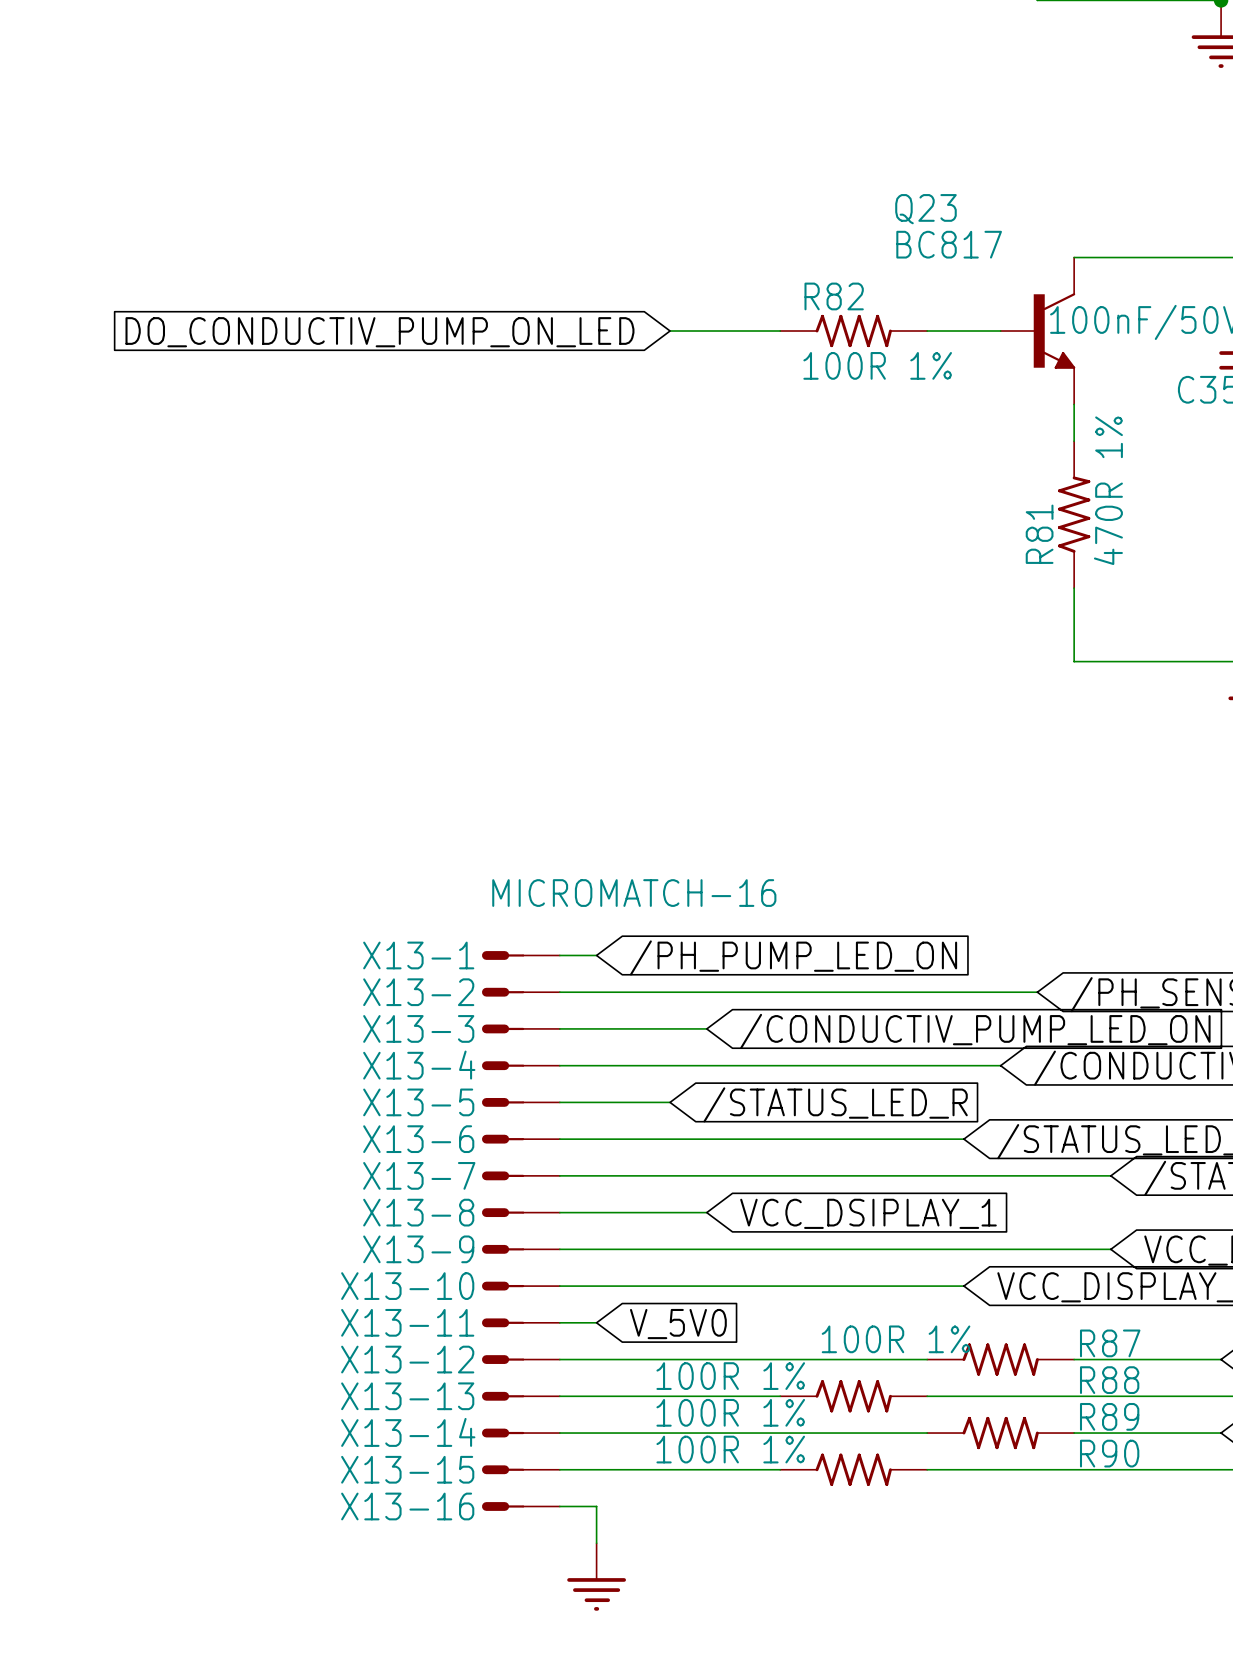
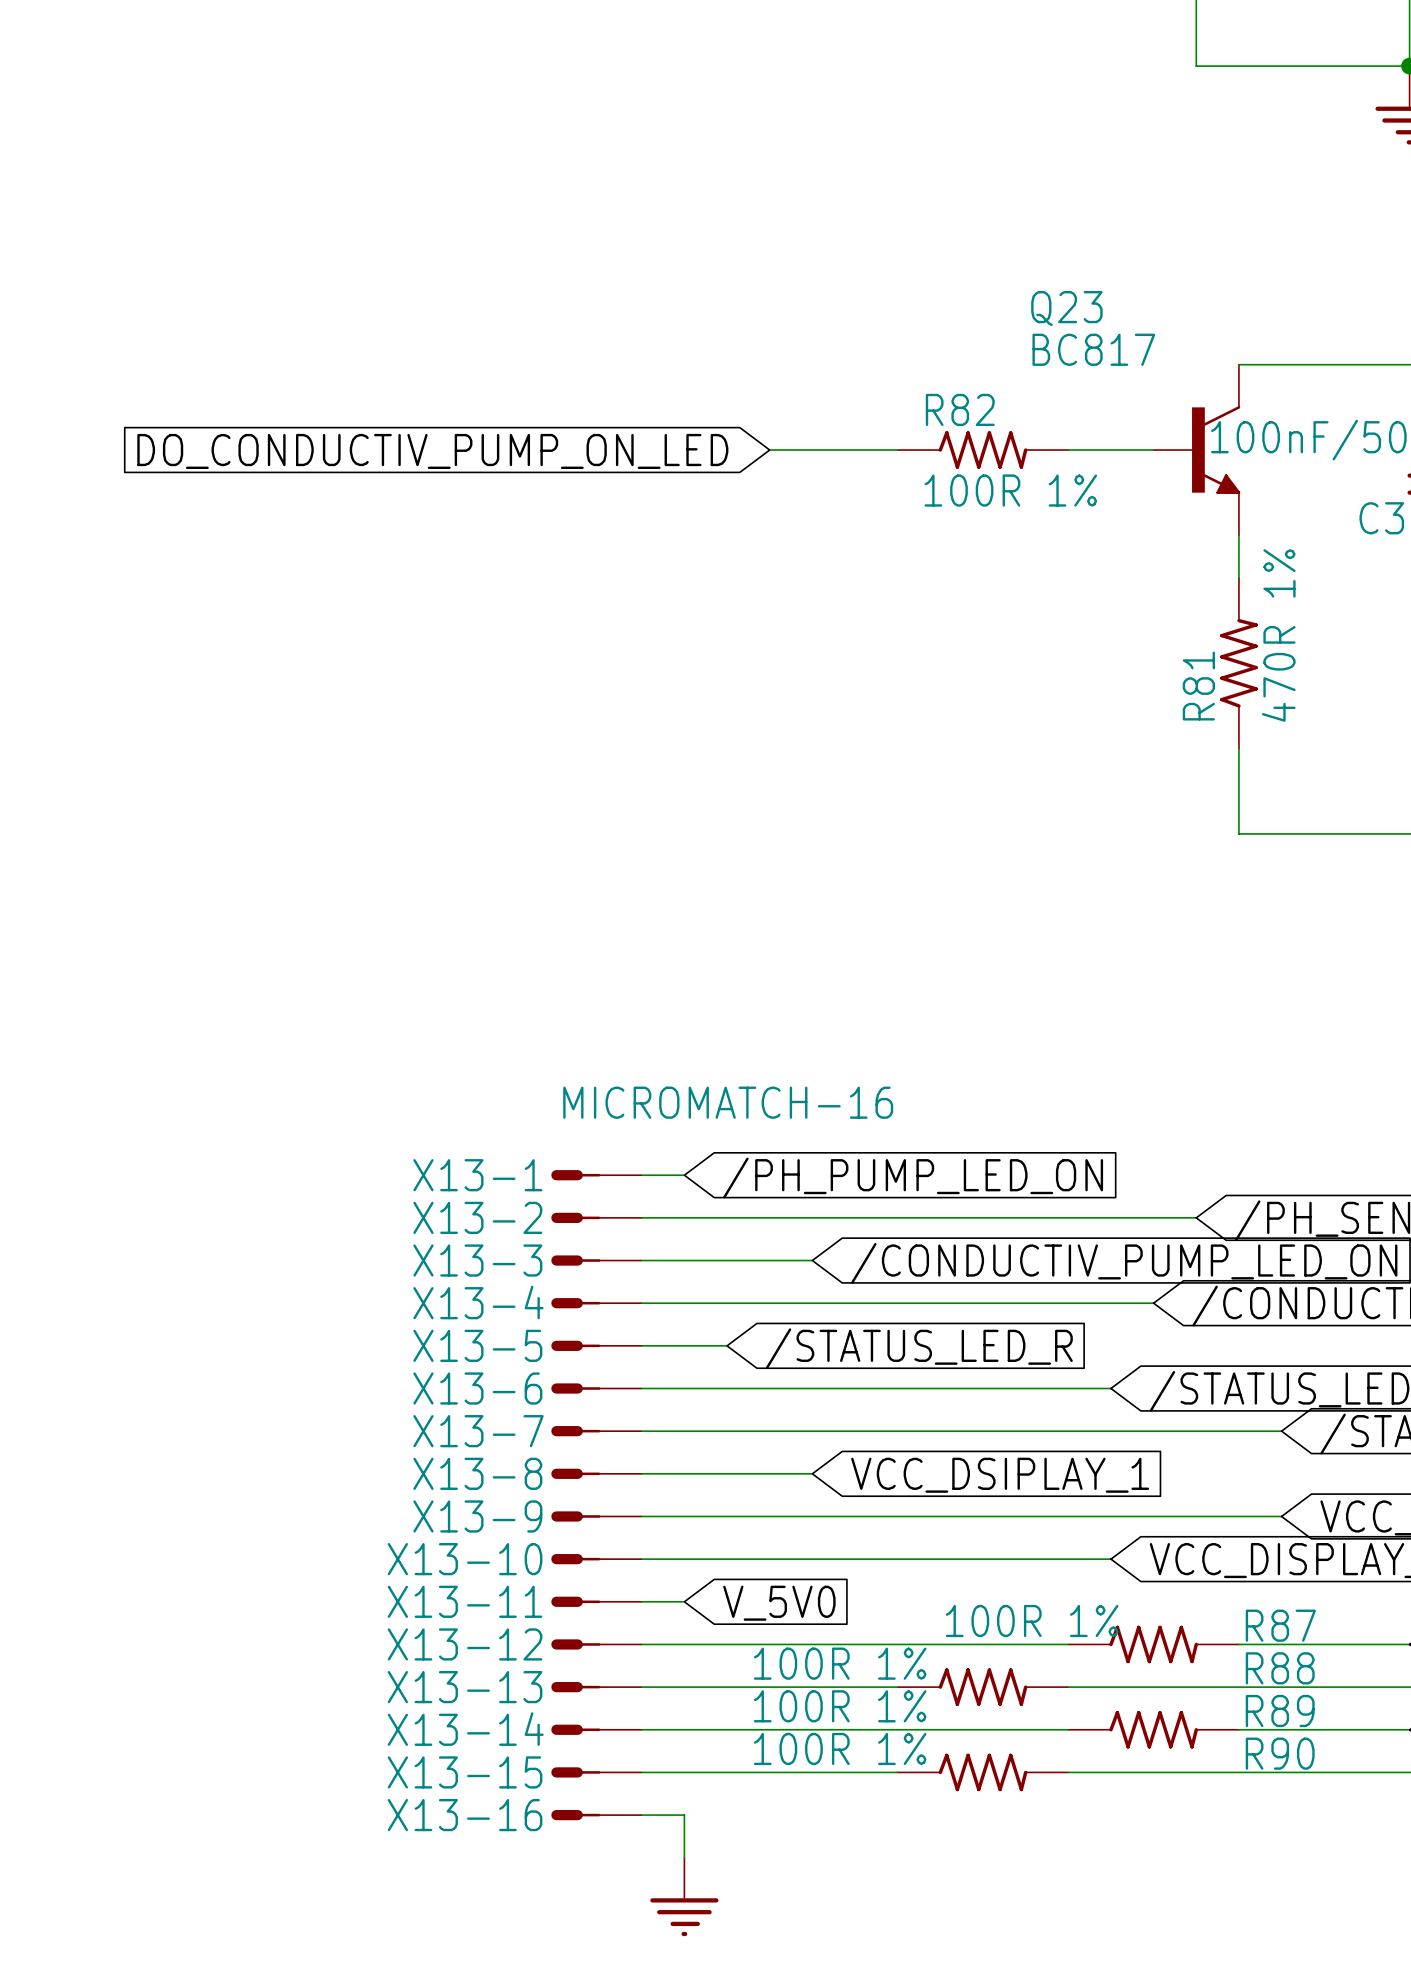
wire: (633, 1102) (670, 1102) -> none
global label position: /STATUS_LED_R (835, 1104) -> /STATUS_LED_R (919, 1348)

